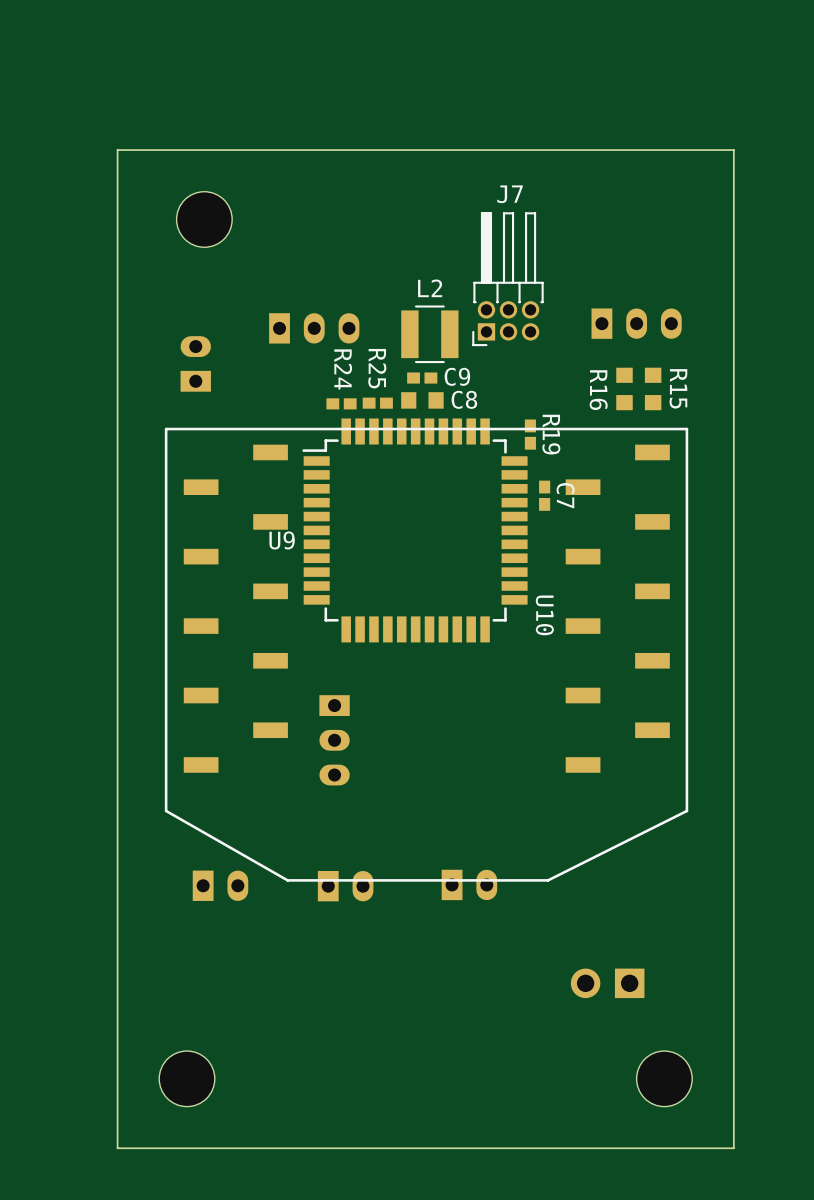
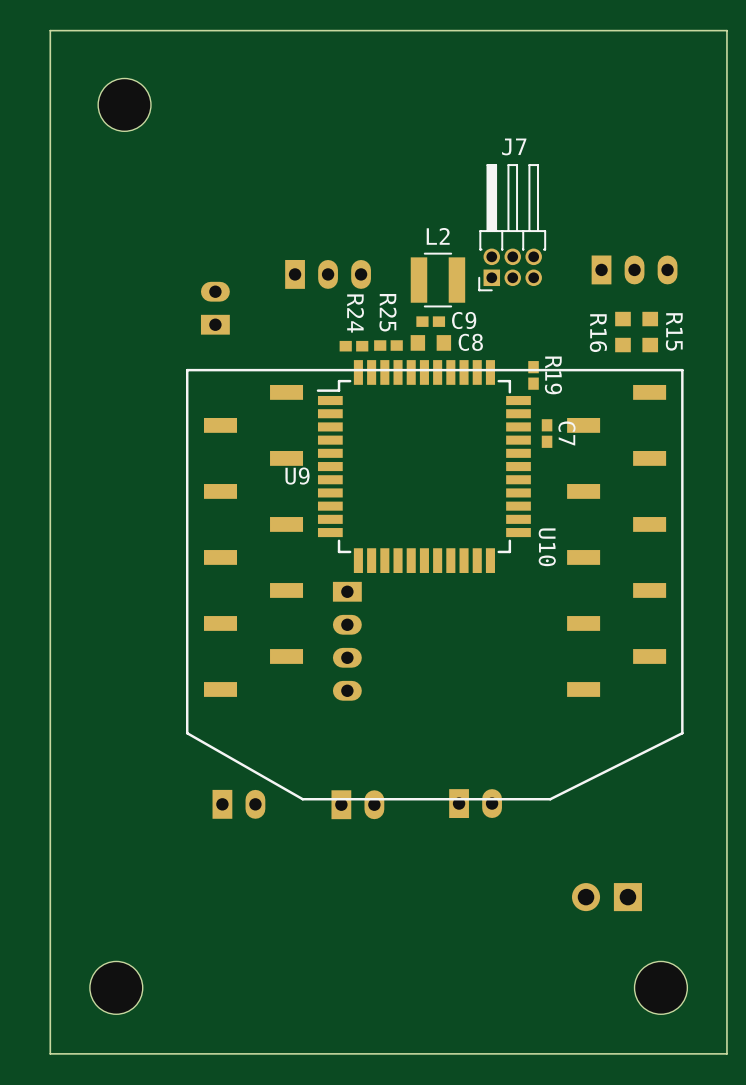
board edge: (733, 150) (117, 150) (117, 1148) -> (726, 104) (726, 30) (50, 30) (50, 1053) (141, 1053)
part position: (204, 219) -> (124, 104)
part: none -> (347, 641)
part: (334, 740) -> none
part position: (187, 1078) -> (116, 987)

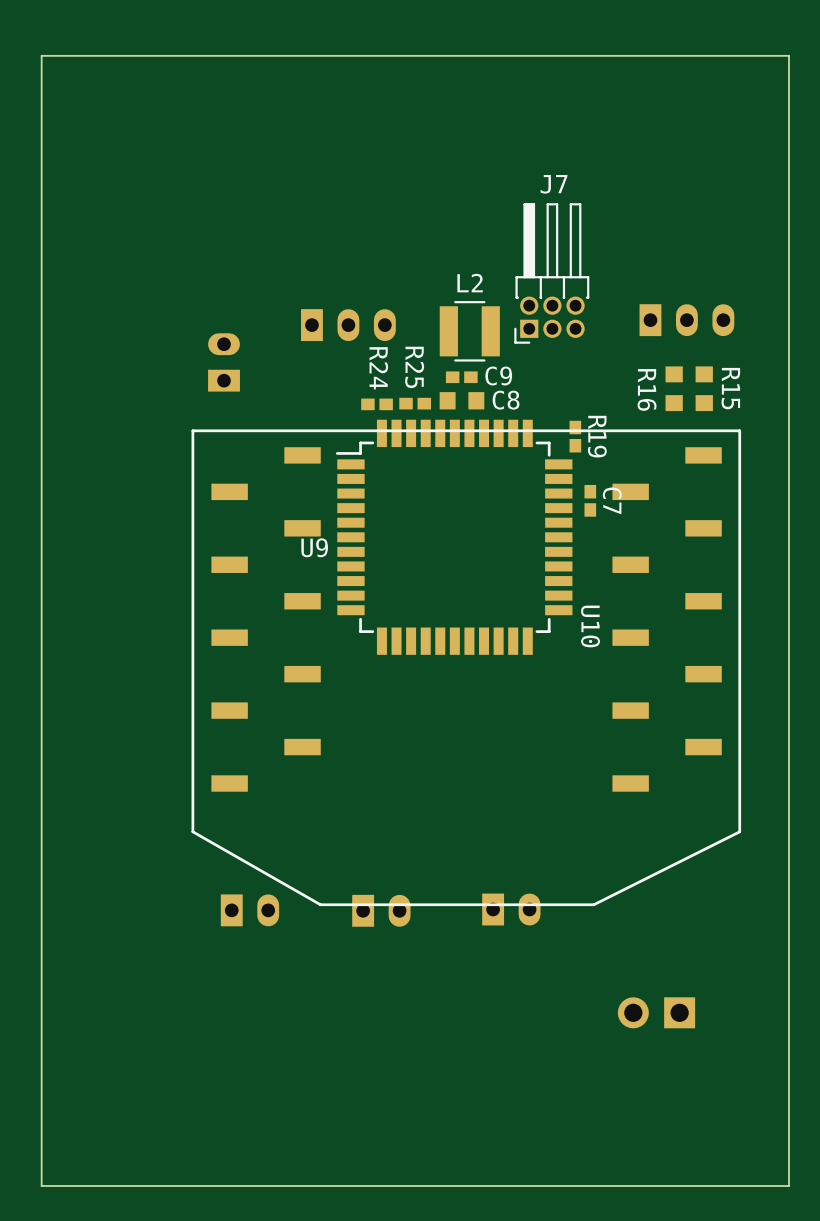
part: (124, 104) -> none
part: (347, 641) -> none
part: (116, 987) -> none
part: (660, 987) -> none

